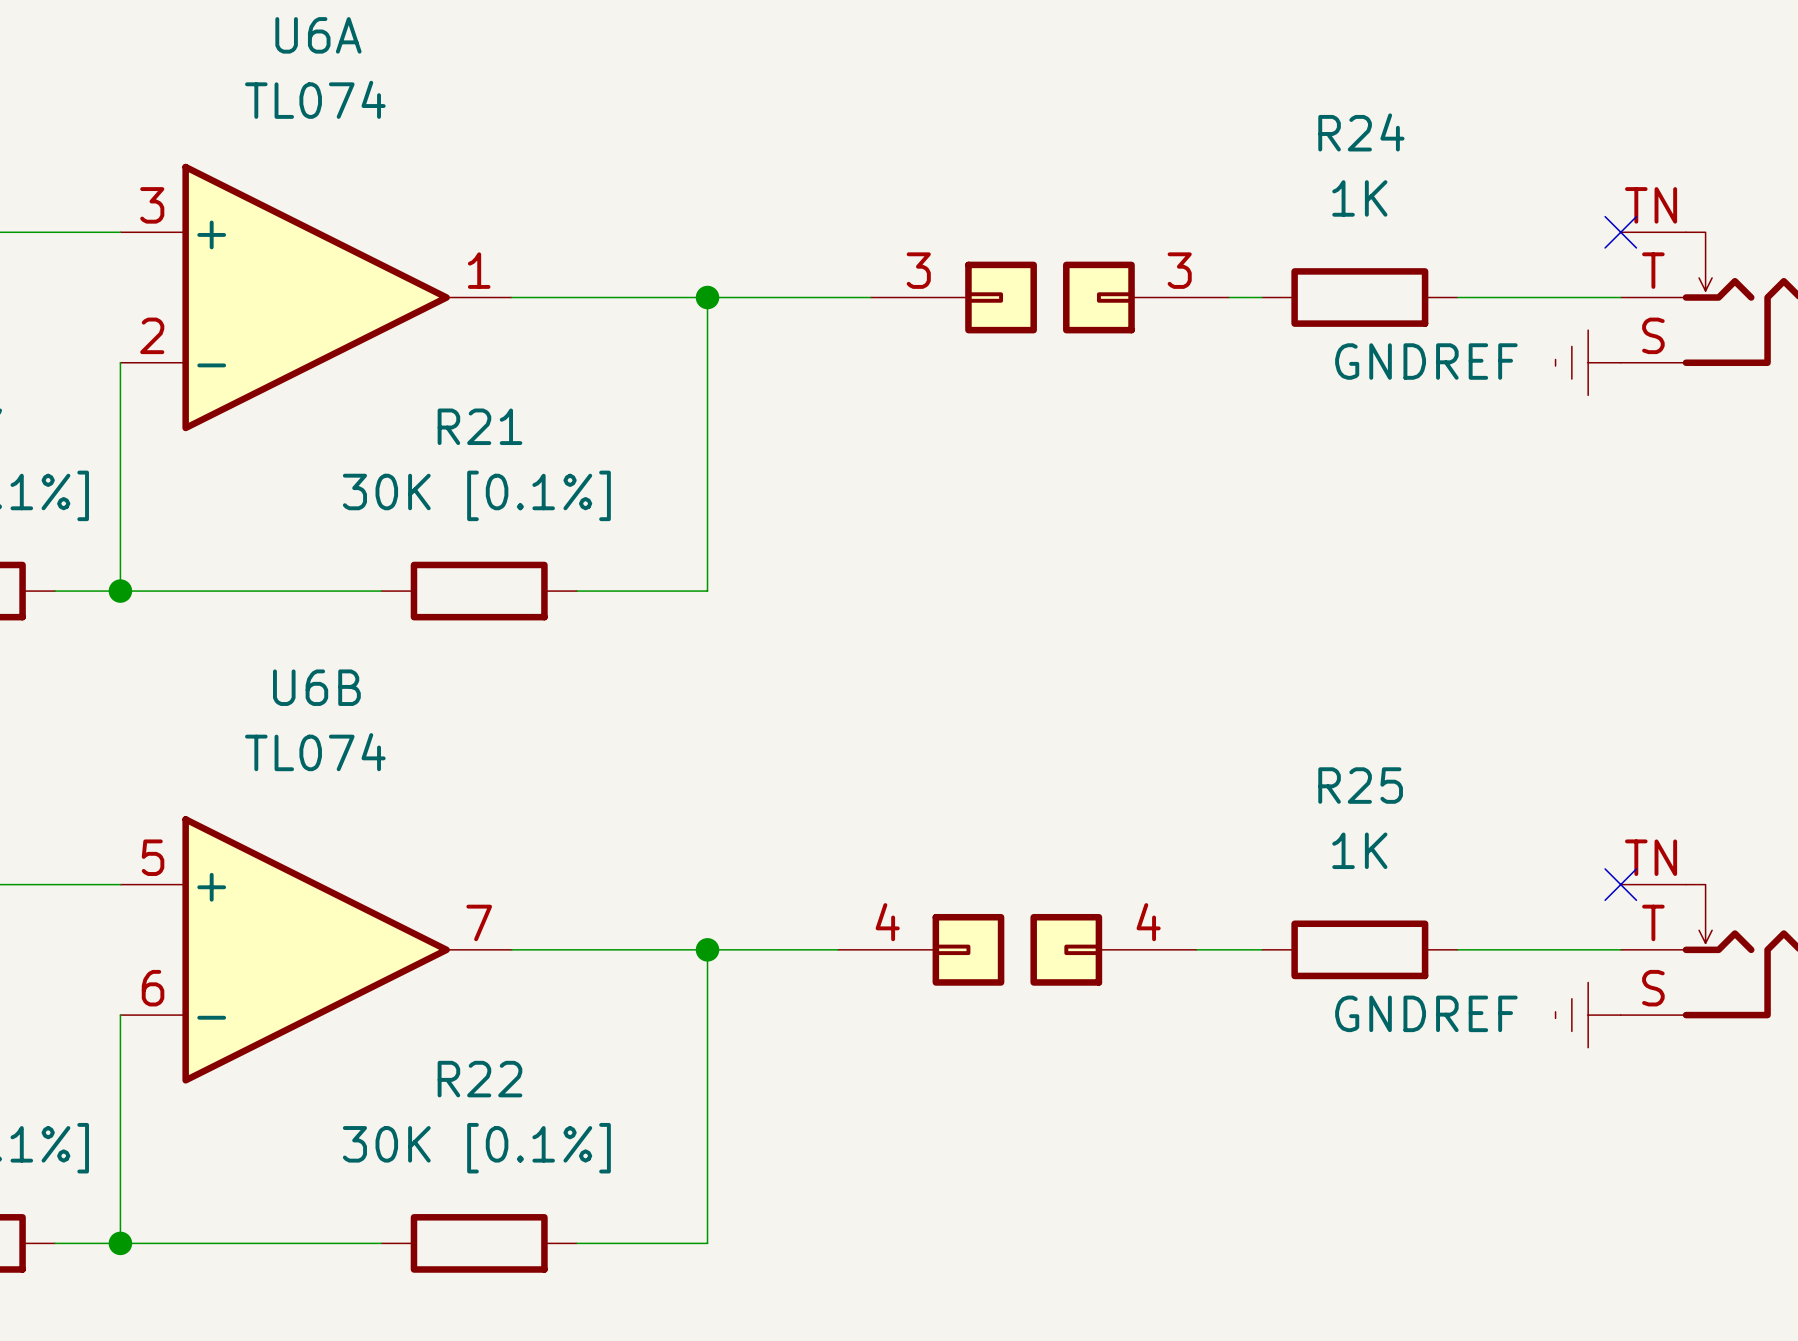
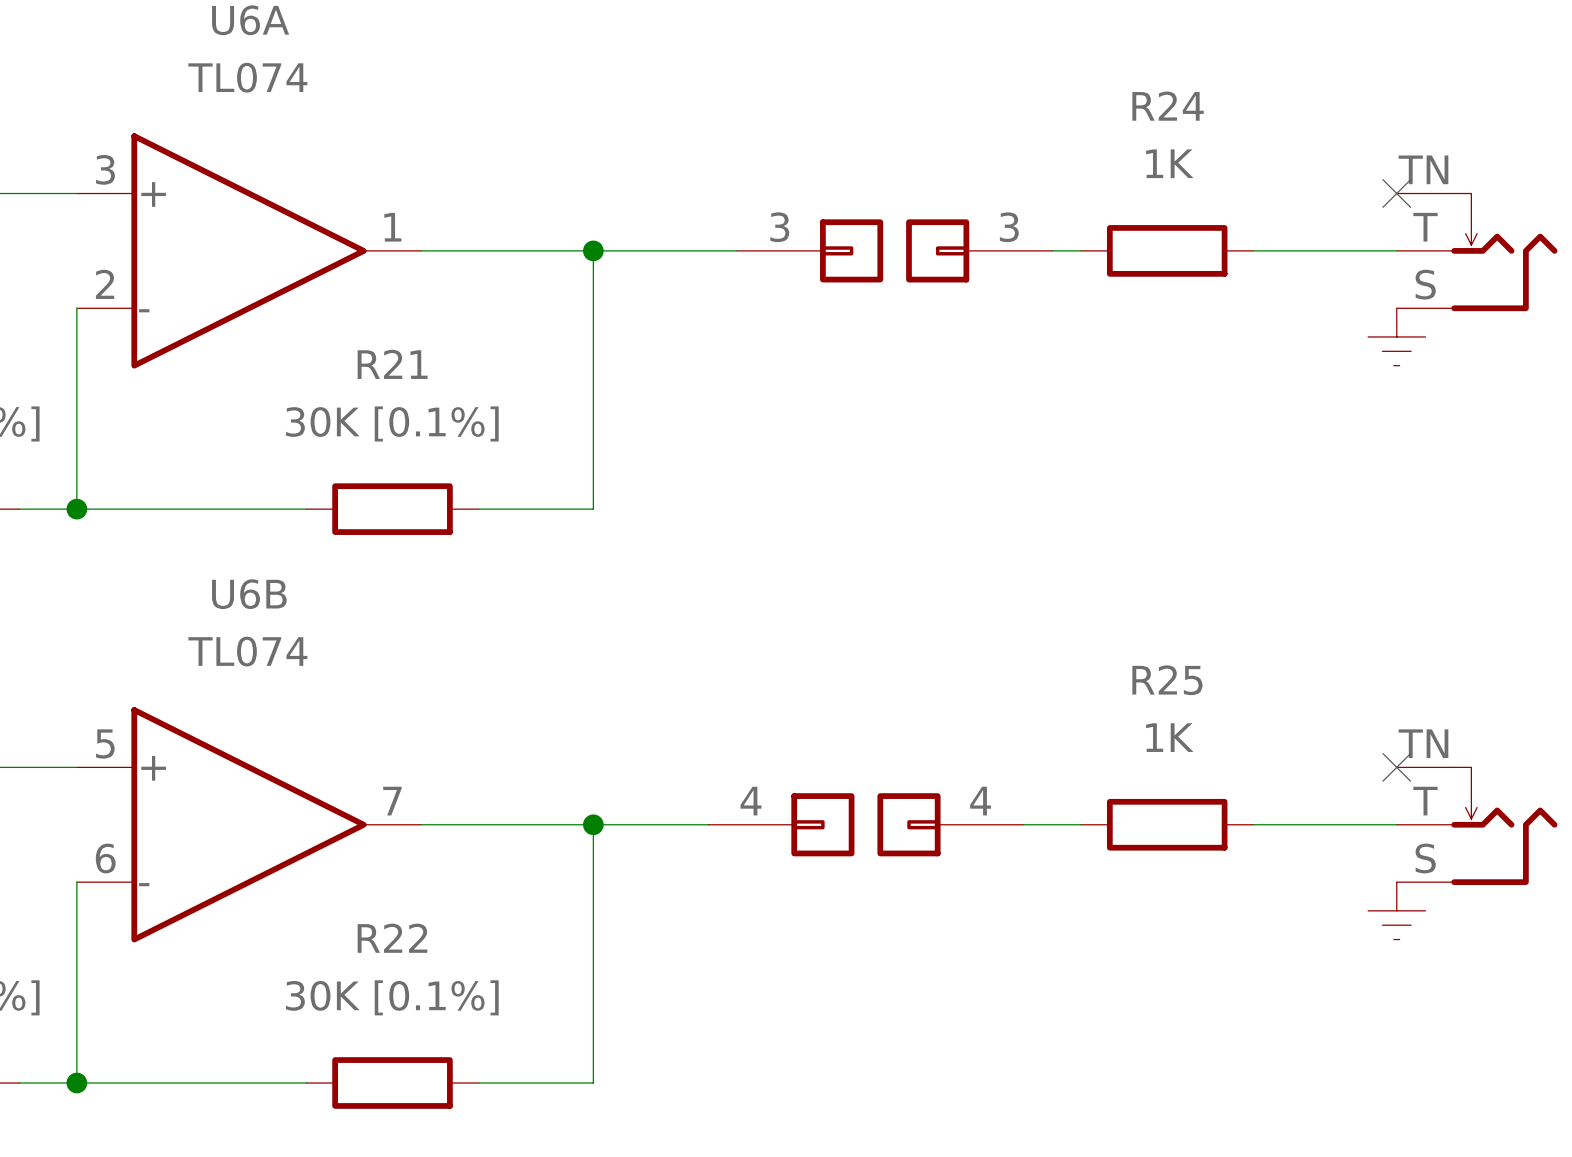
power symbol: GNDREF (1588, 362) -> none
power symbol: none -> (1396, 336)
power symbol: GNDREF (1588, 1015) -> none
power symbol: none -> (1396, 910)

